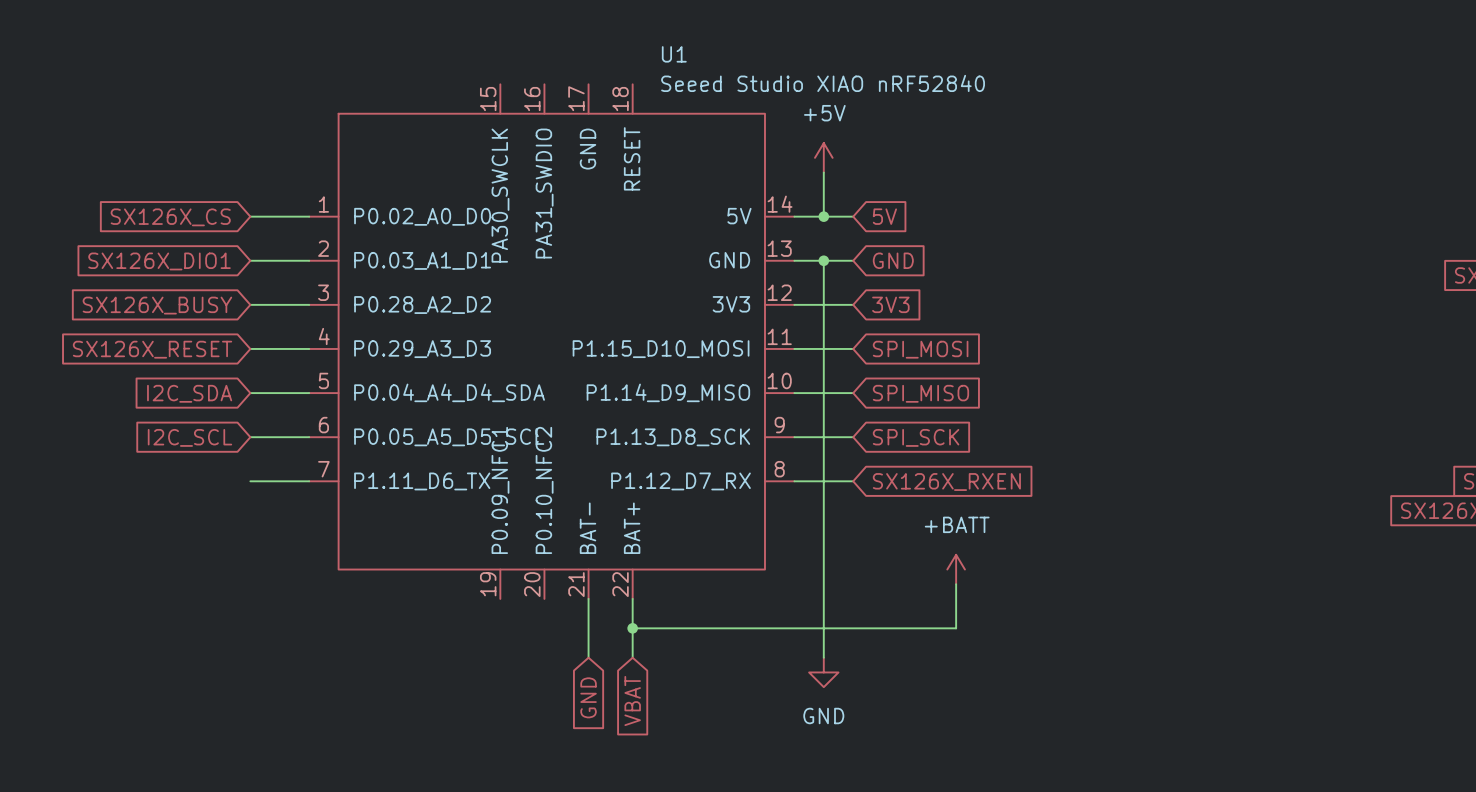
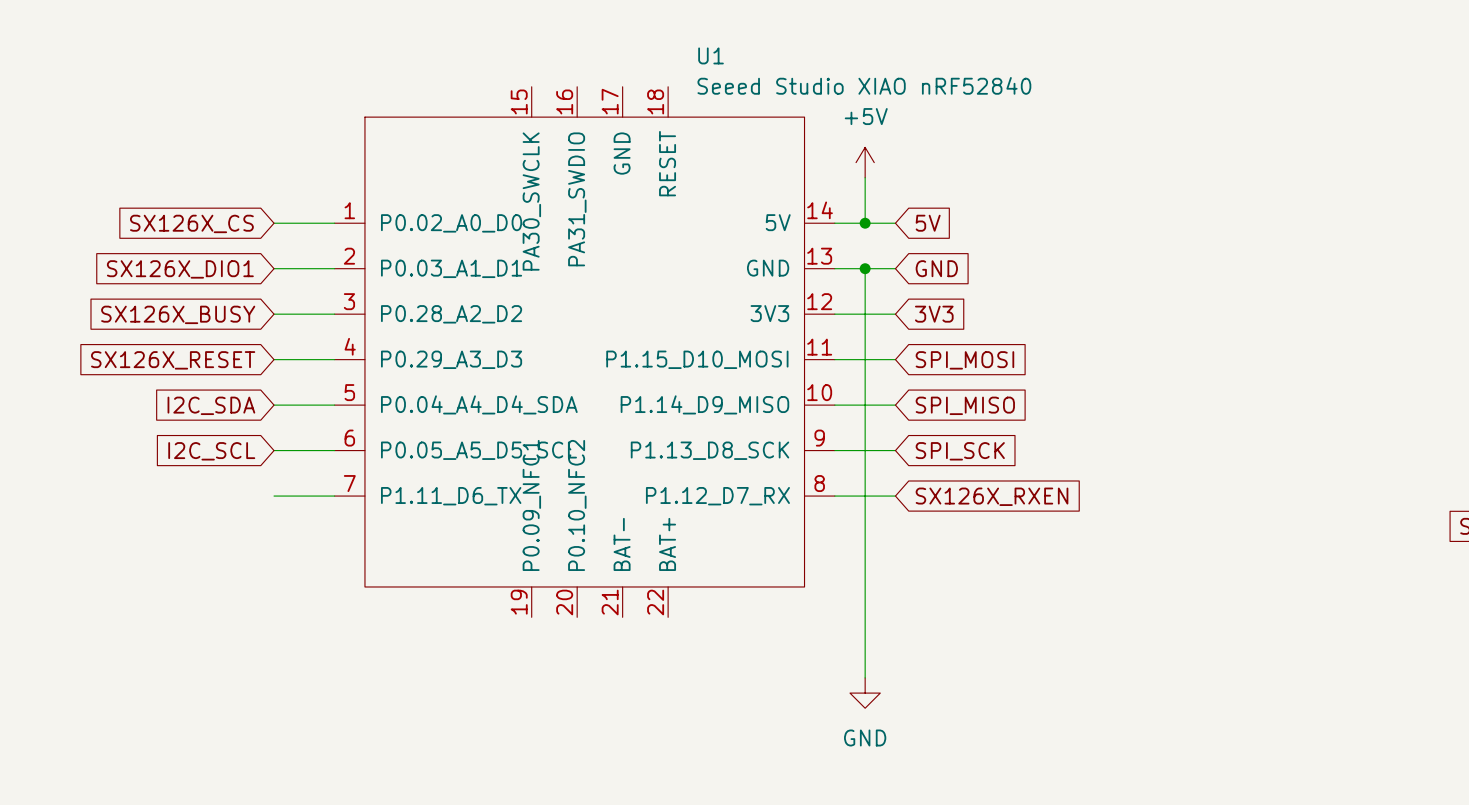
power symbol: +BATT (956, 569) -> none
wire: (956, 584) (956, 628) (632, 628) -> none
wire: (588, 598) (588, 657) -> none
wire: (632, 598) (632, 657) -> none
junction: (632, 628) -> none
global label: GND (588, 697) -> none
global label: VBAT (632, 701) -> none

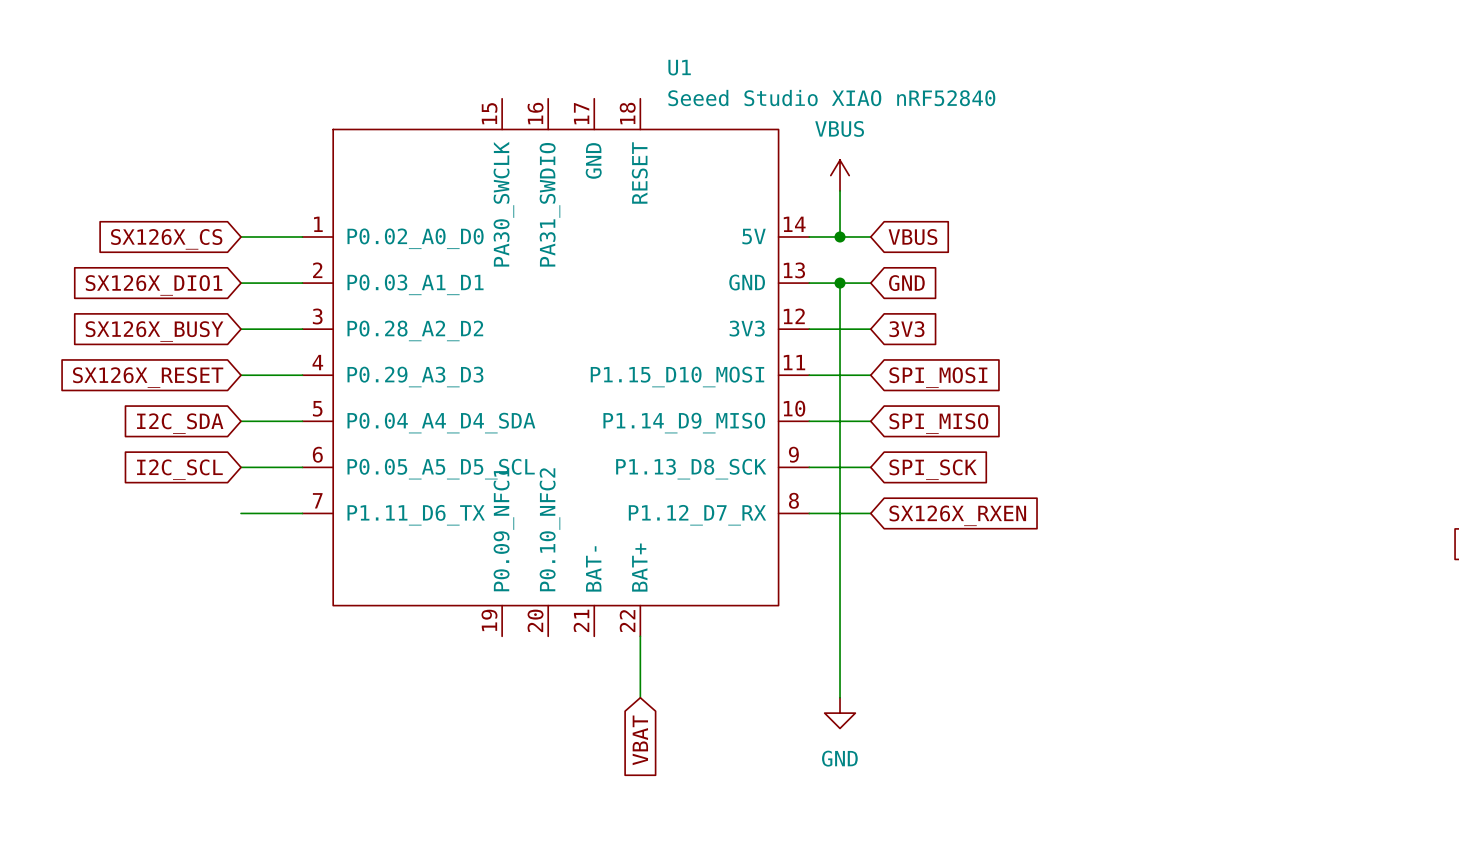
power symbol: +5V (865, 162) -> VBUS (840, 175)
global label: 5V (928, 223) -> VBUS (912, 237)
wire: none -> (640, 636) (640, 697)
global label: none -> VBAT (640, 740)

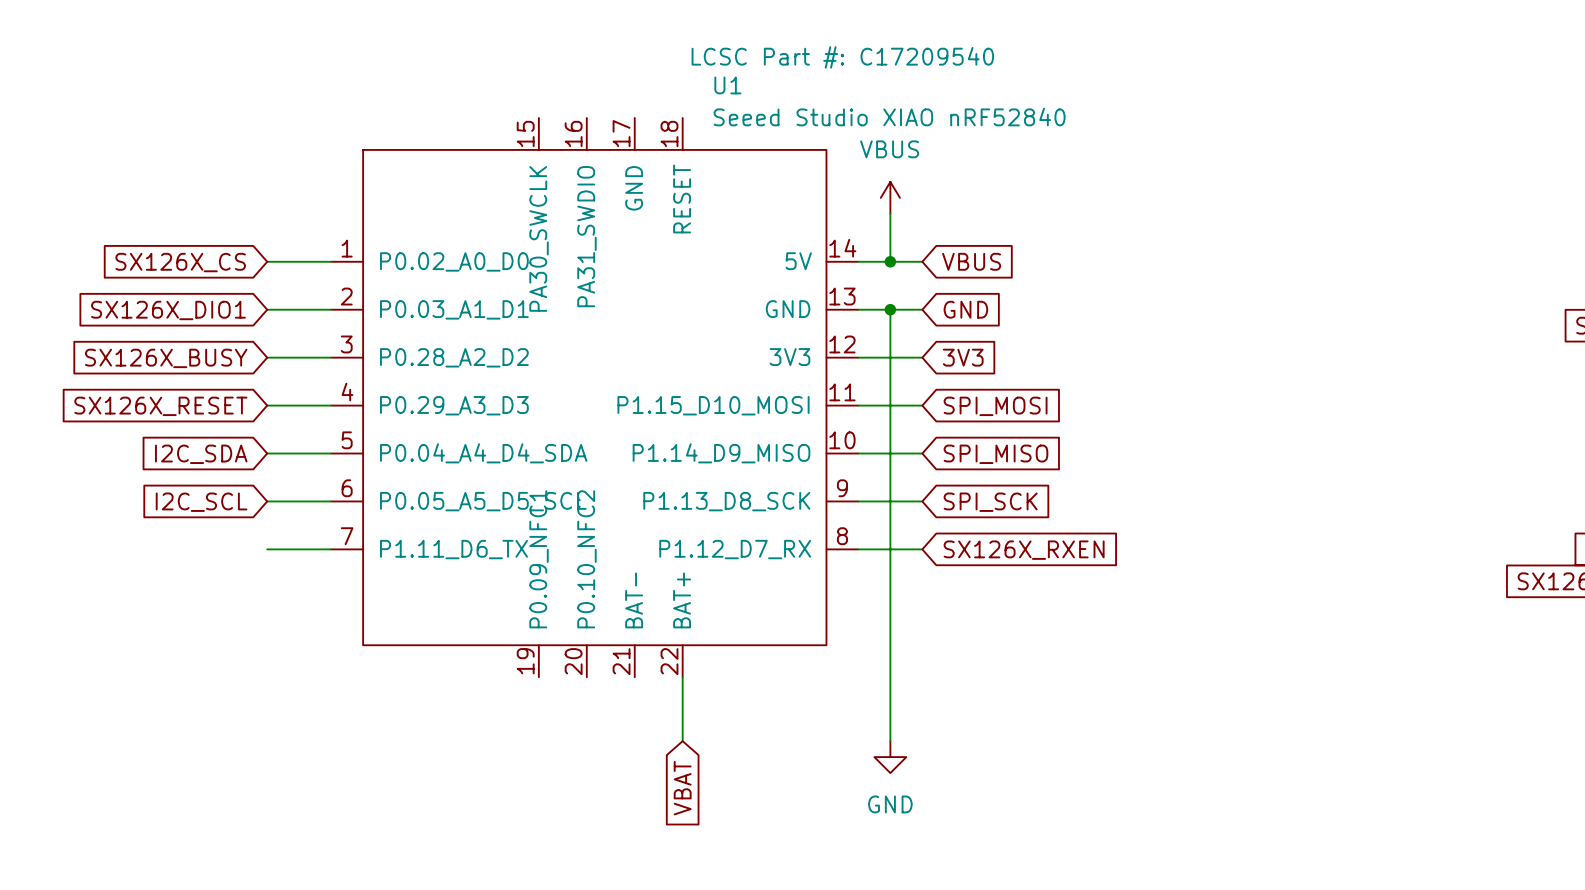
U1 text: none -> LCSC Part #: C17209540 (842, 57)

